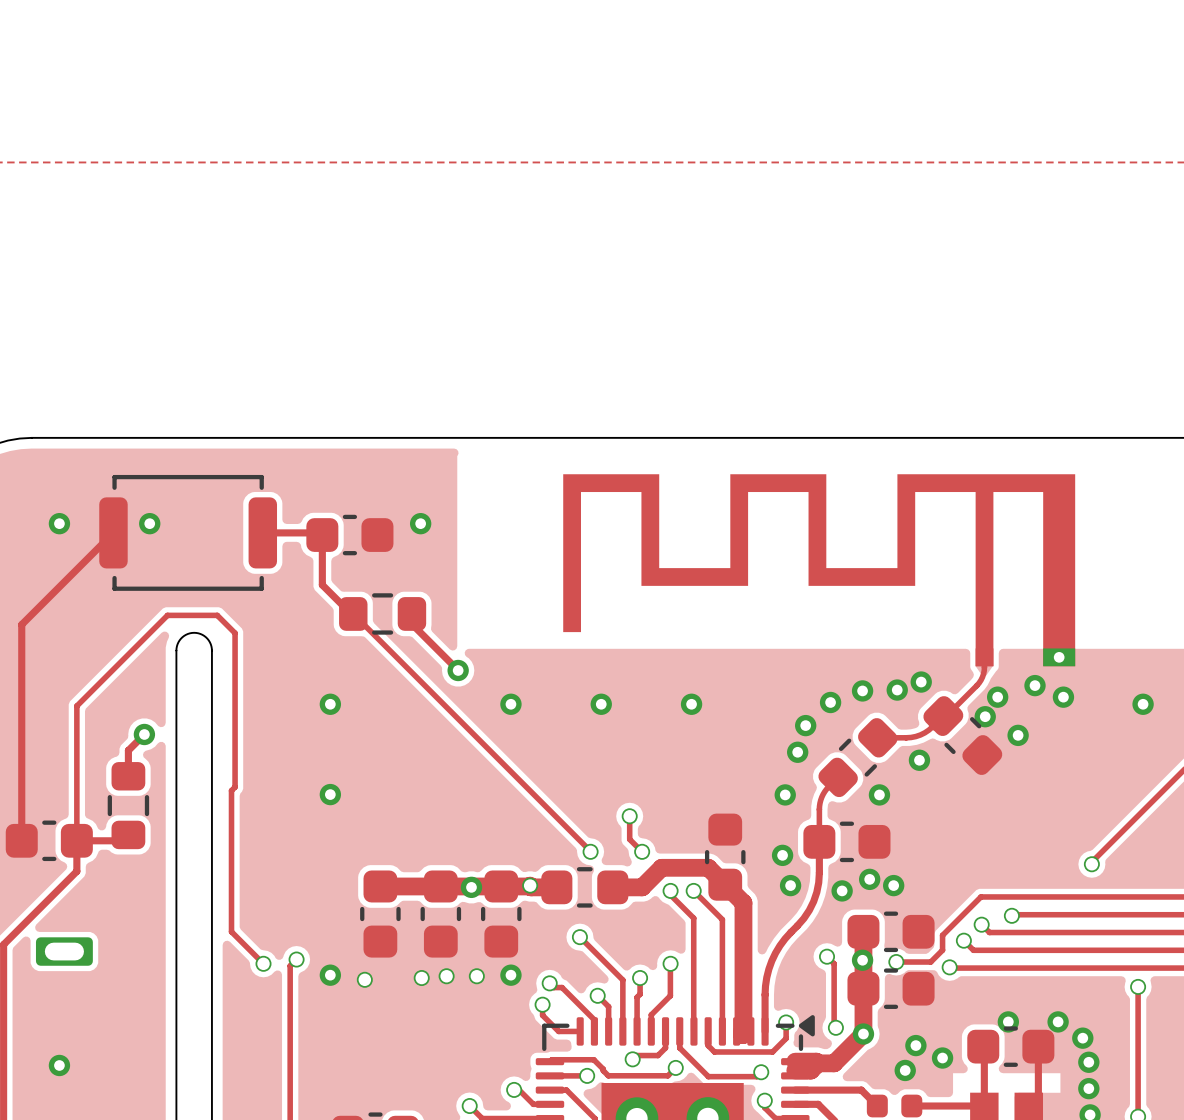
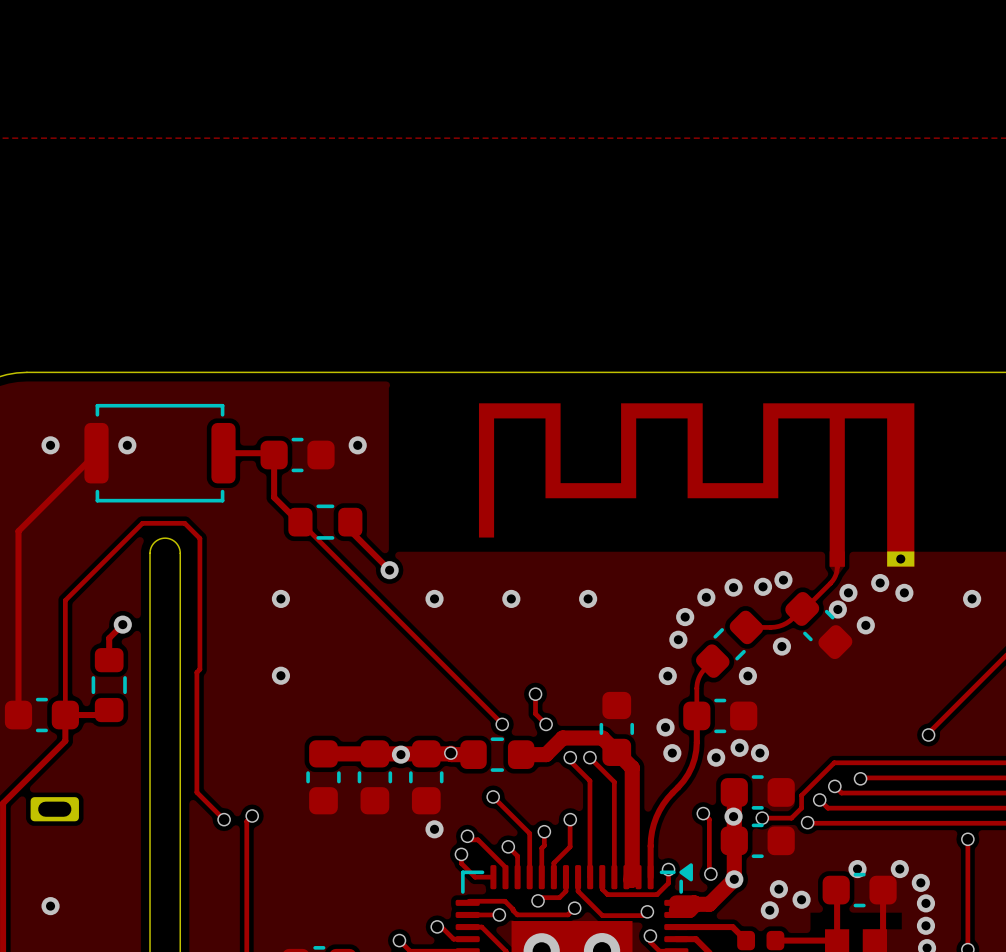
via: (330, 975) -> none
via: (446, 976) -> none
via: (476, 976) -> none
via: (421, 978) -> none
via: (364, 979) -> none

